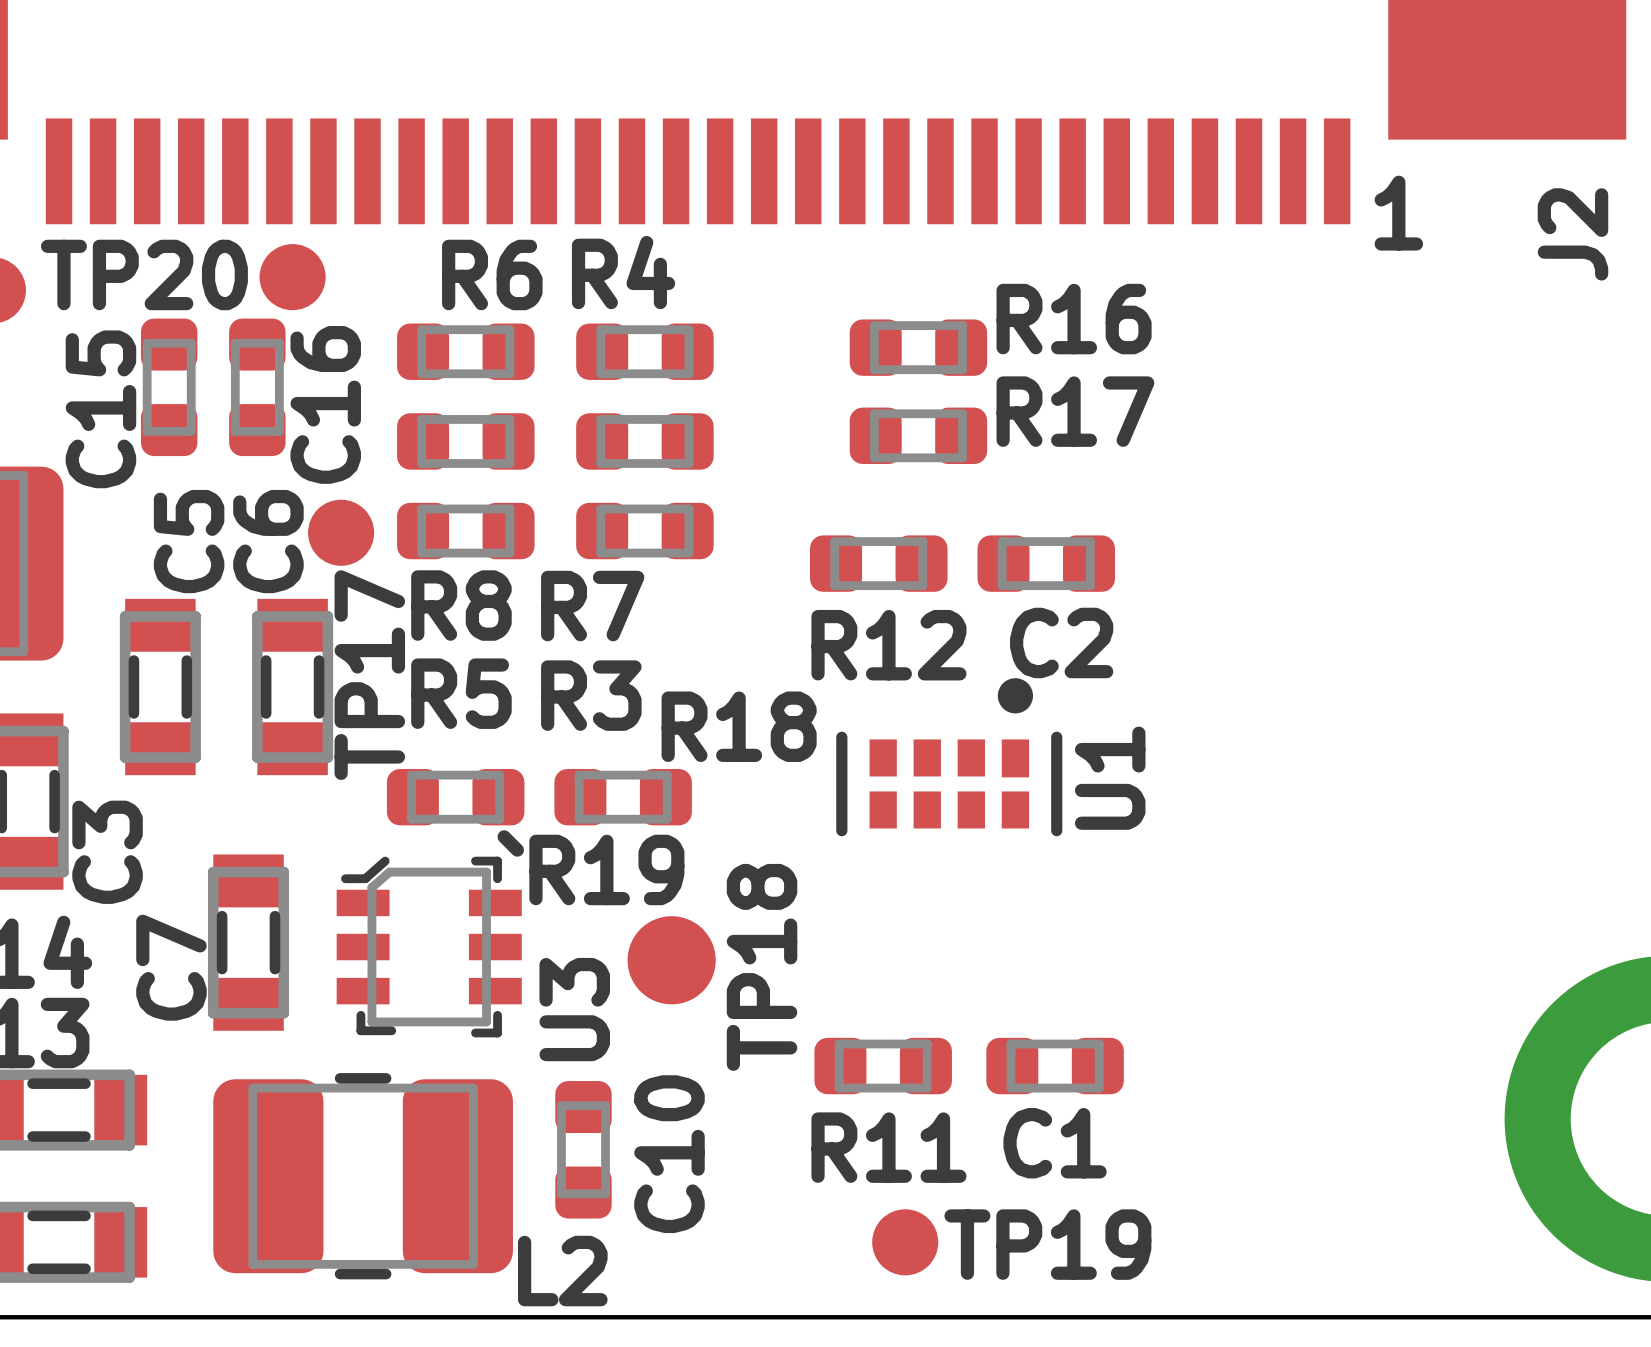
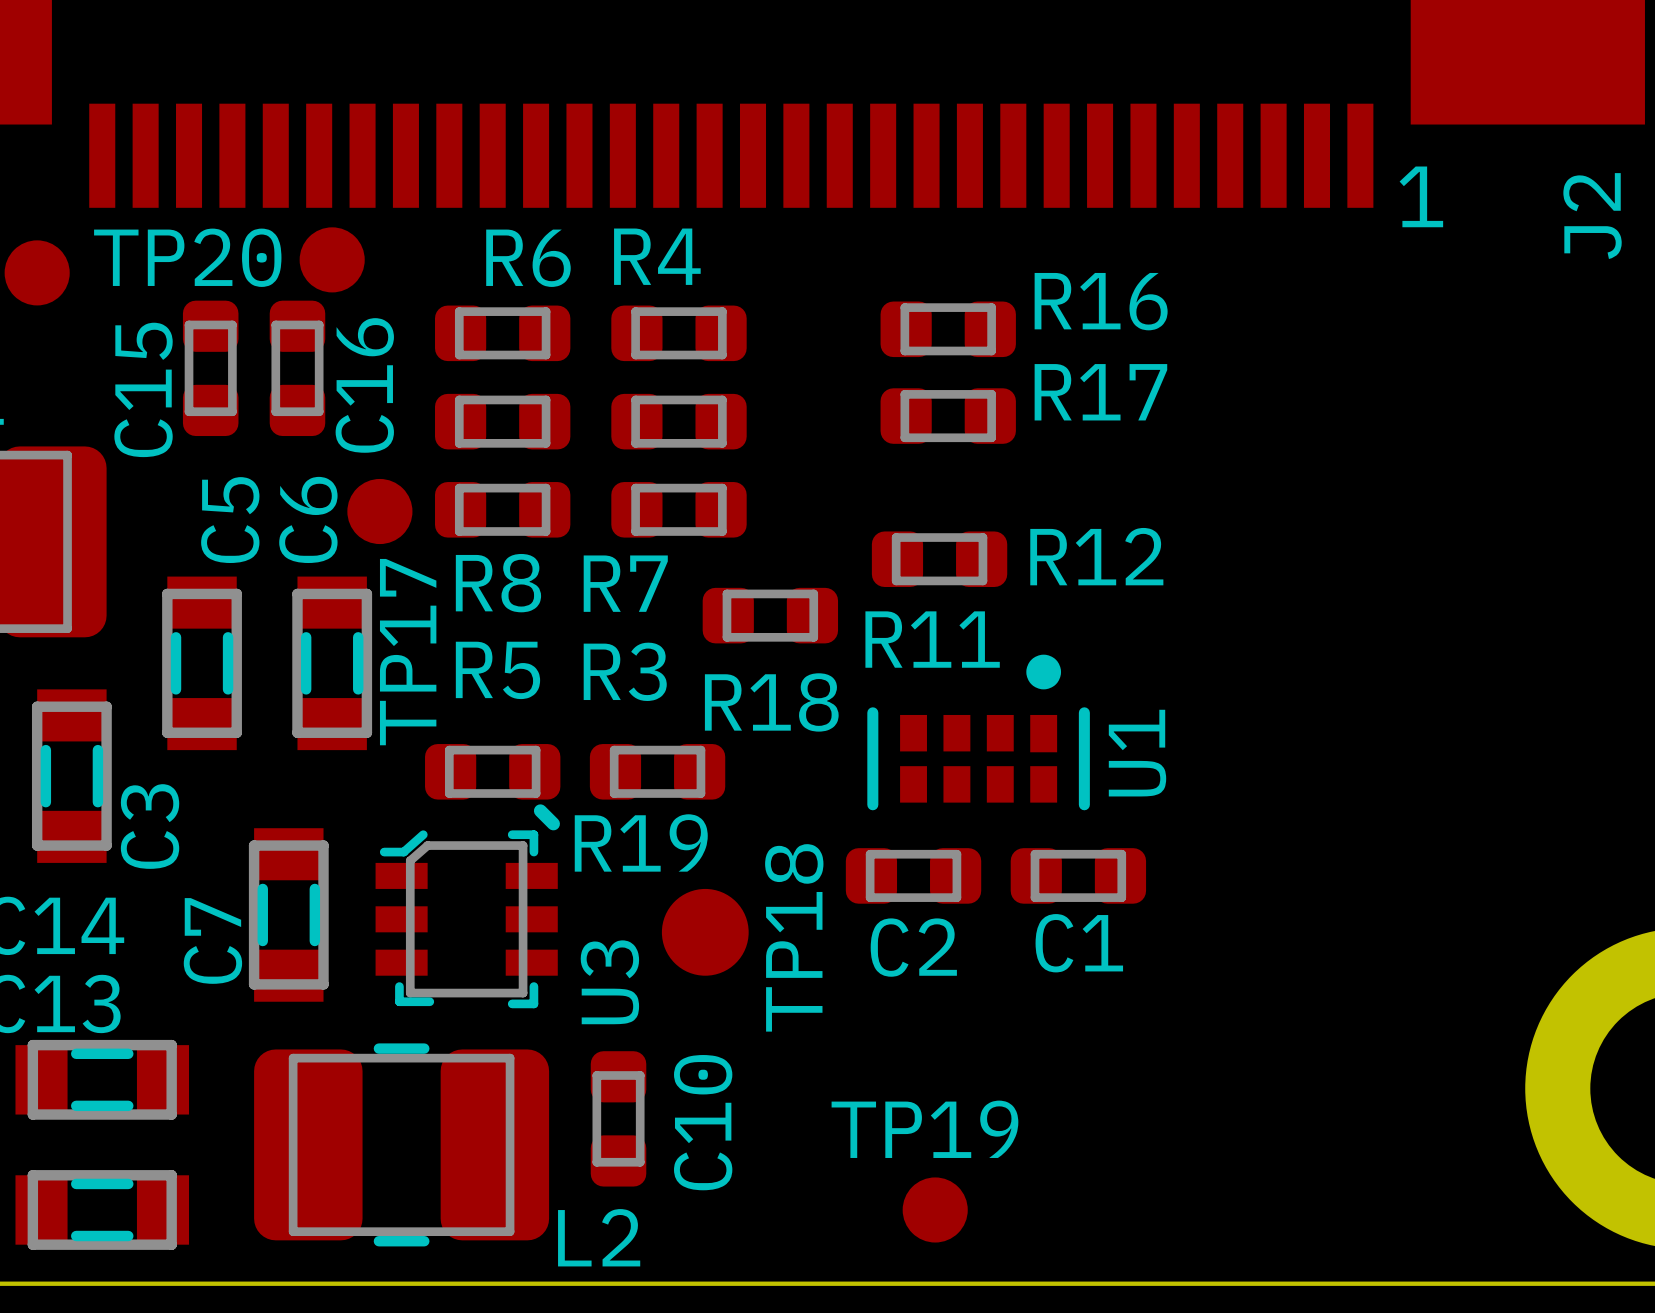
R12 position: (878, 563) -> (939, 559)
C2 position: (1046, 563) -> (913, 875)
C2 name position: C2 (1061, 642) -> C2 (913, 947)
R12 name position: R12 (888, 645) -> R12 (1096, 556)
R11 position: (883, 1066) -> (770, 615)
C1 position: (1055, 1066) -> (1078, 875)
C1 name position: C1 (1055, 1143) -> C1 (1079, 943)
R11 name position: R11 (888, 1147) -> R11 (932, 639)
TP19 name position: TP19 (1047, 1244) -> TP19 (924, 1129)

